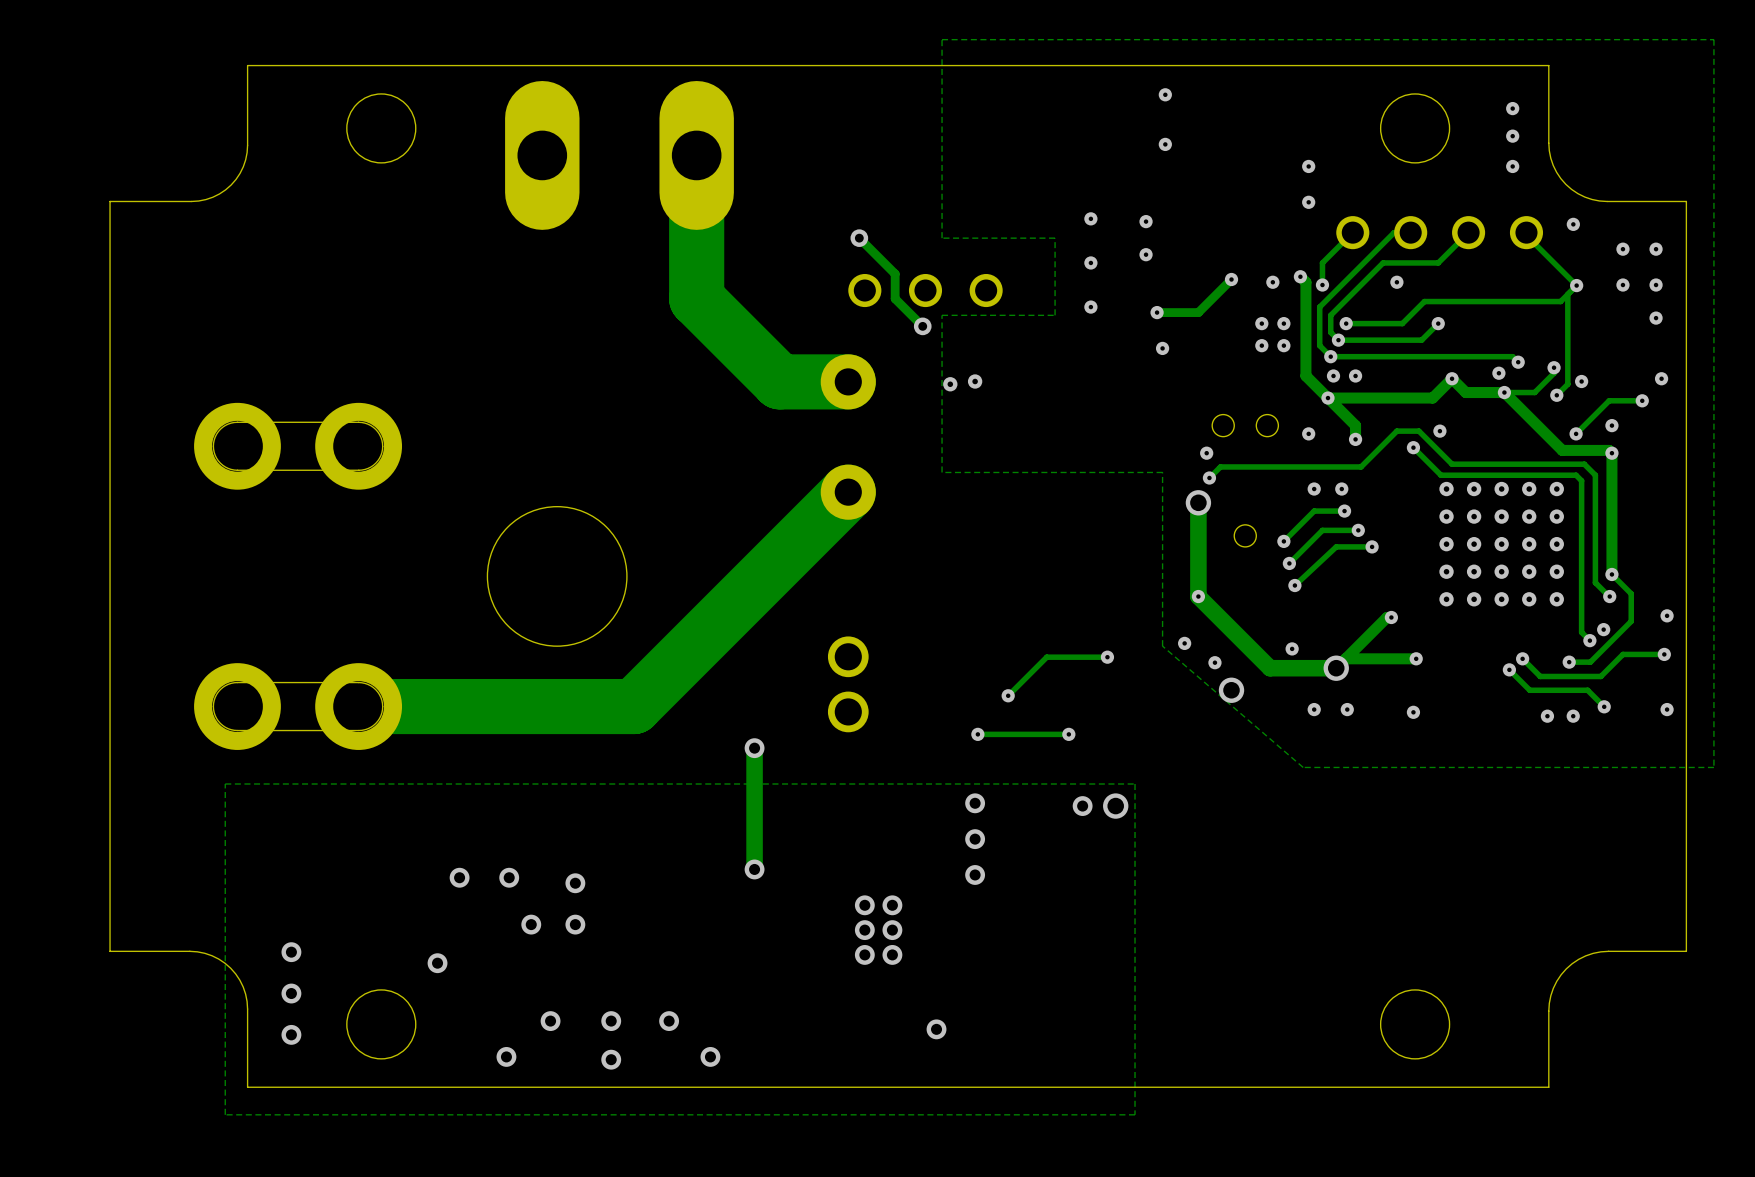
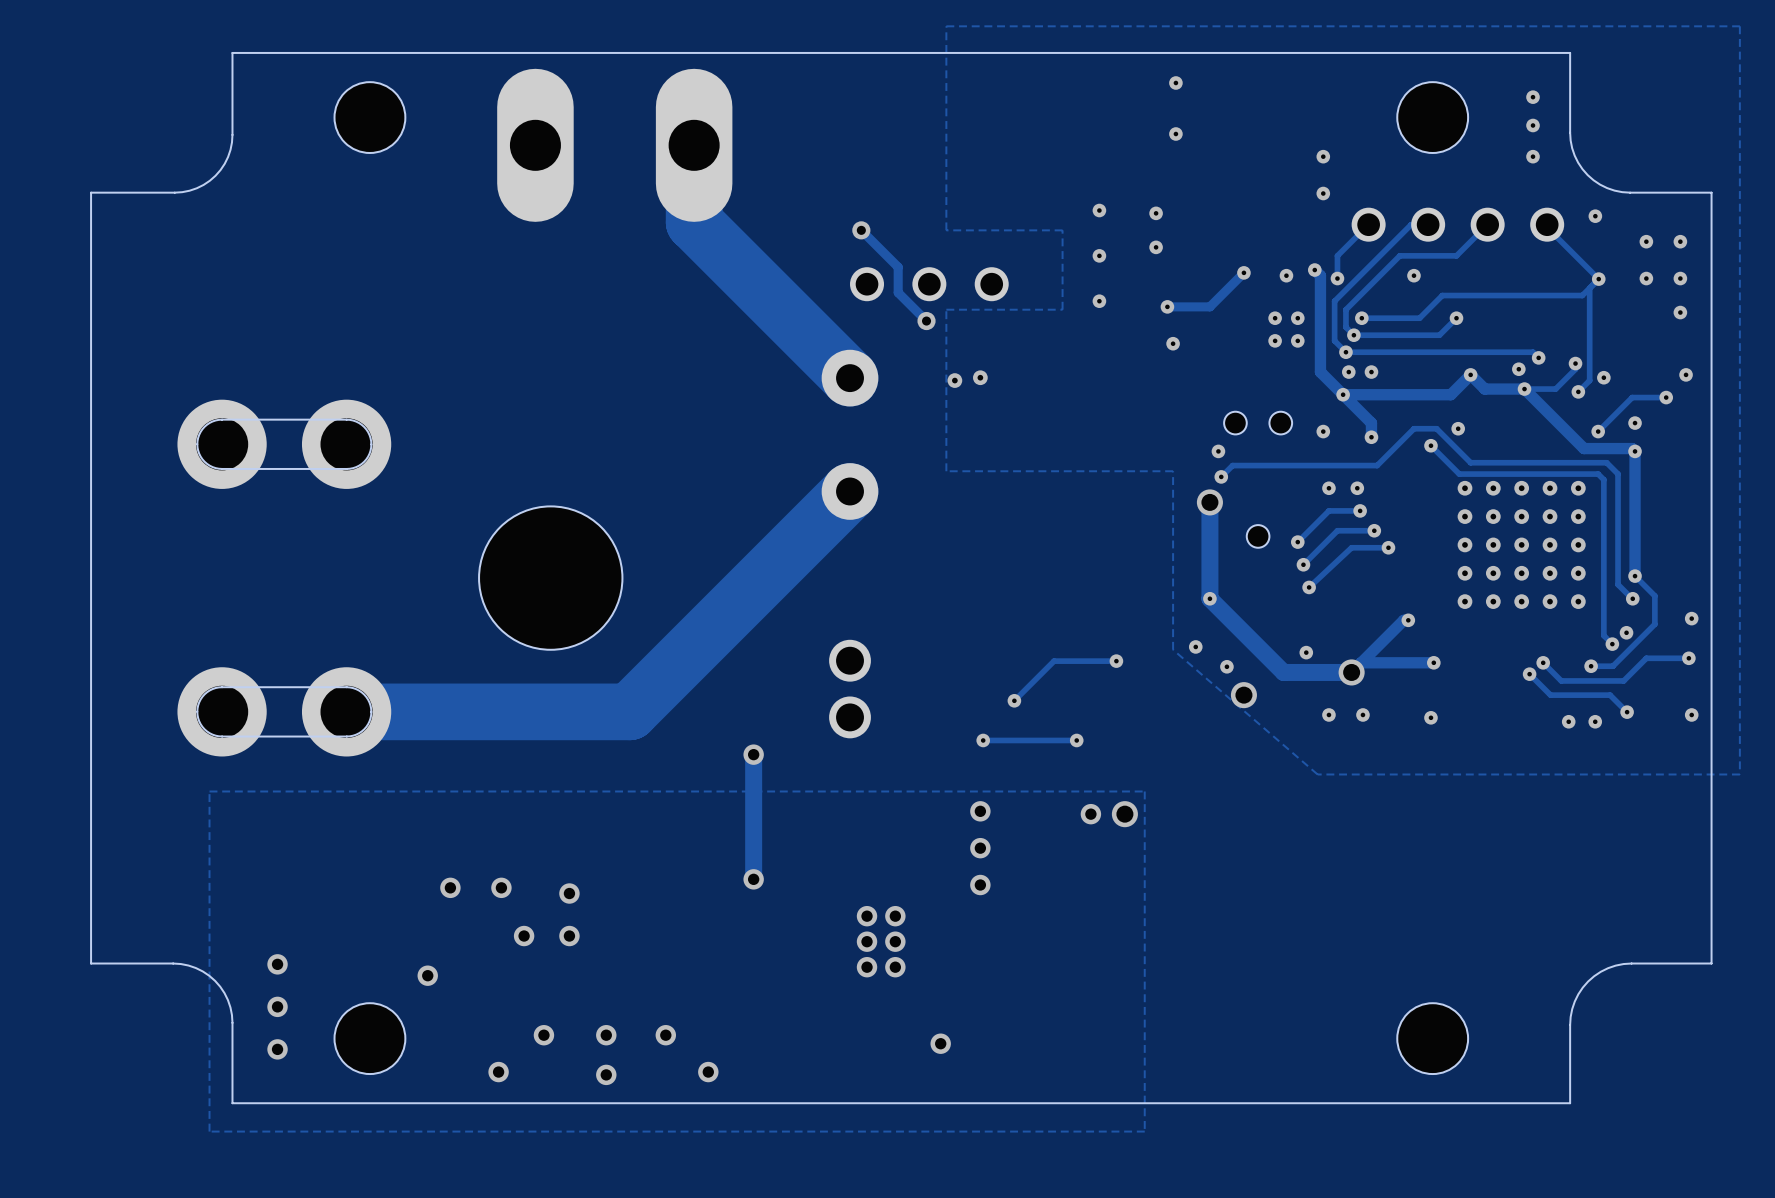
track: (696, 230) (696, 298) (779, 381) (848, 381) -> (694, 222) (850, 378)

